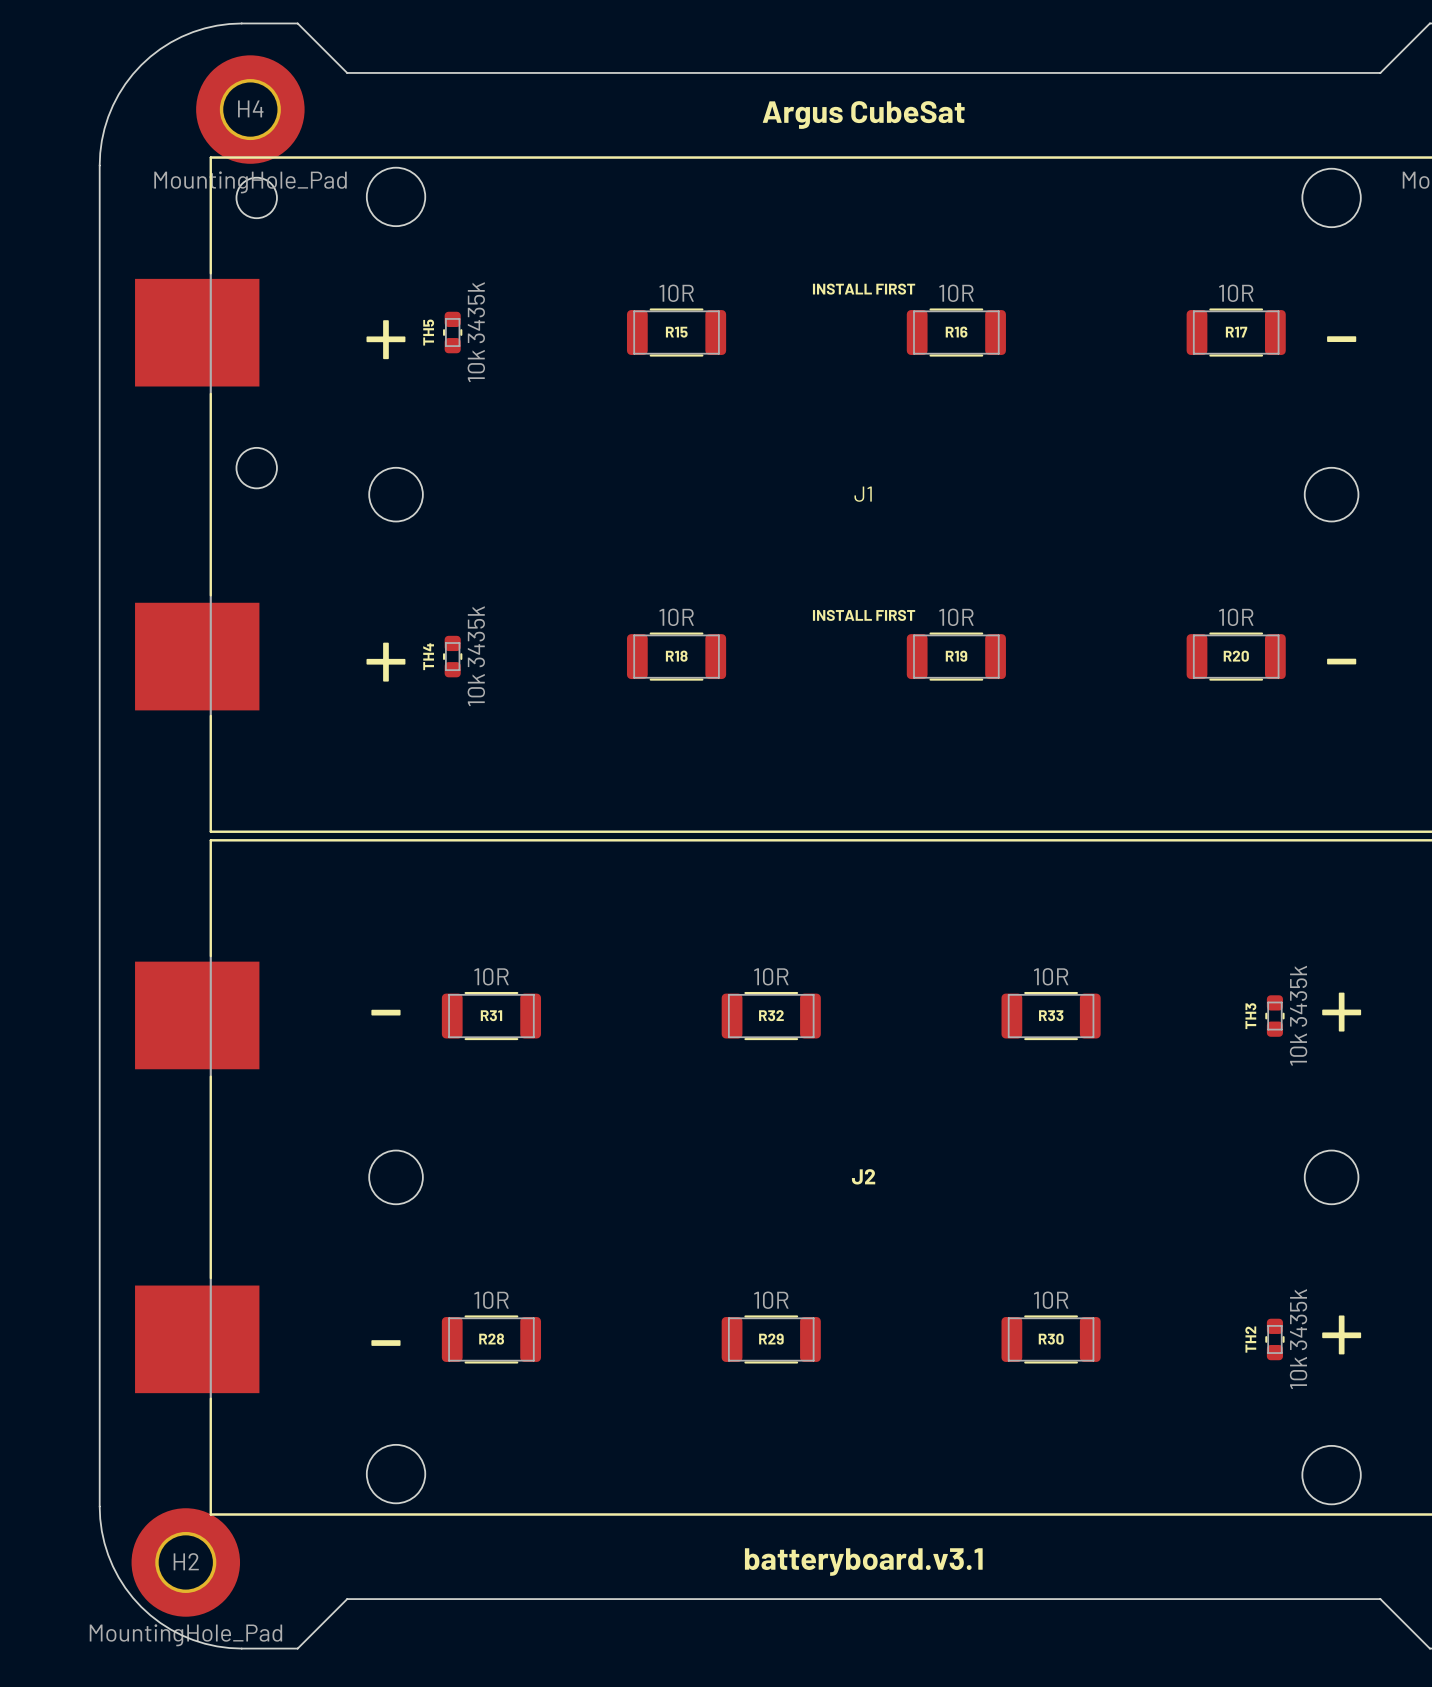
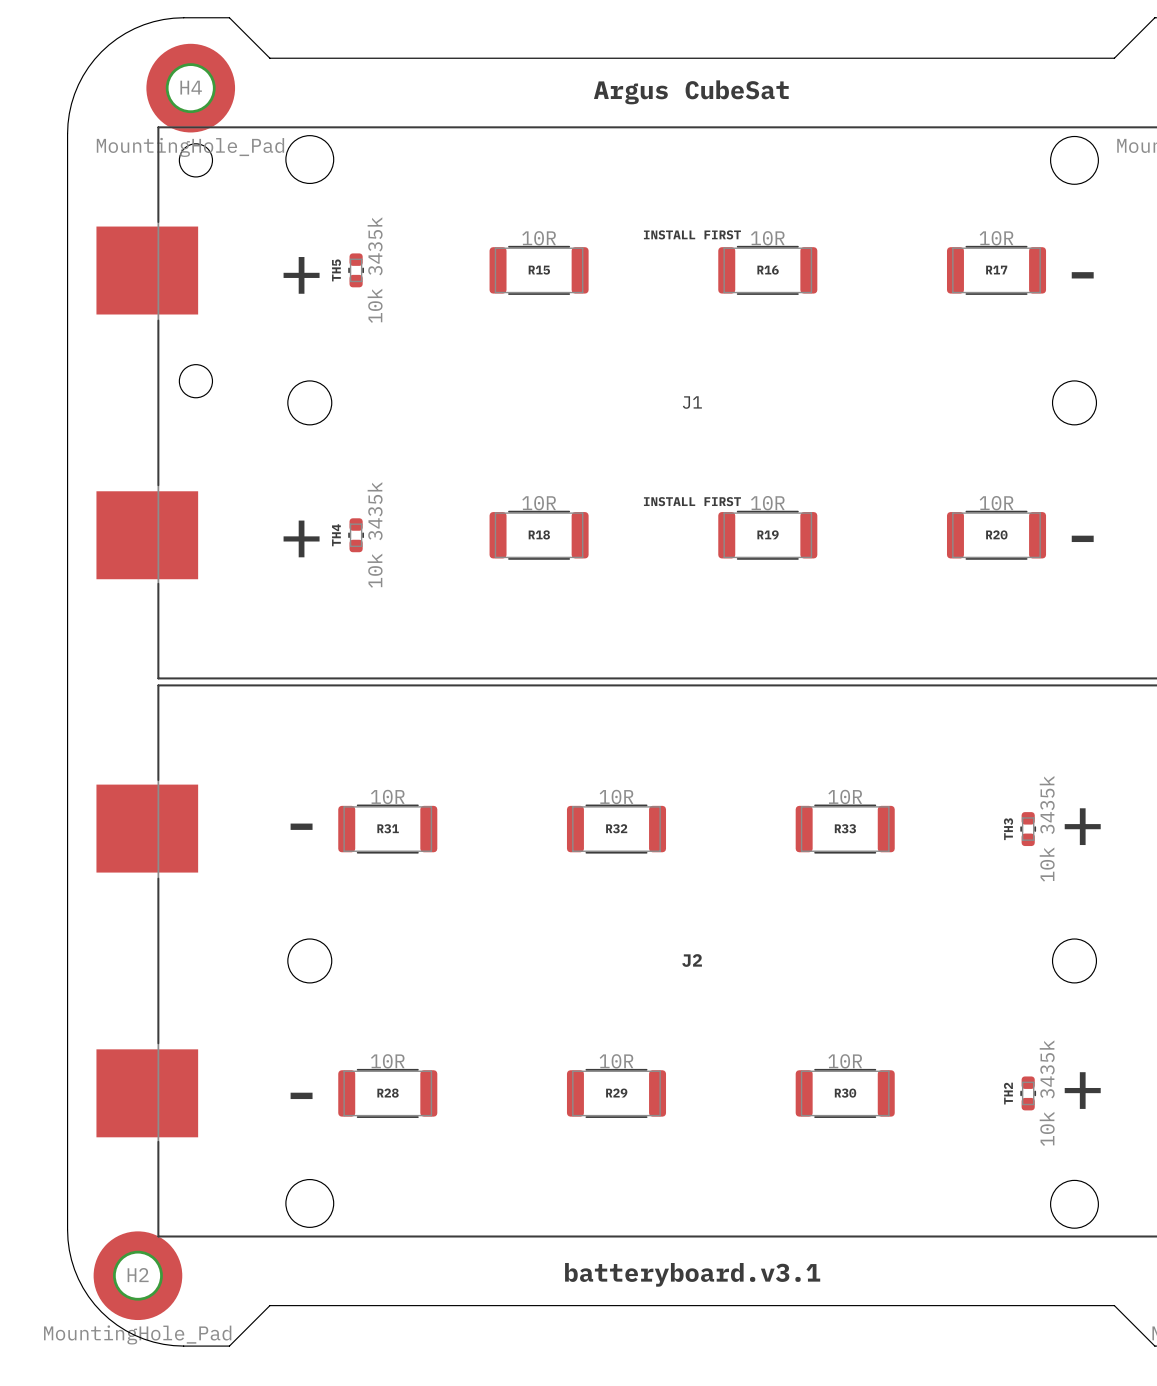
R15 footprint: [626, 308, 727, 357] -> [489, 245, 589, 295]
R16 footprint: [906, 308, 1006, 357] -> [718, 245, 818, 295]
R17 footprint: [1186, 308, 1286, 357] -> [946, 245, 1047, 295]
R18 footprint: [626, 632, 727, 681] -> [489, 510, 589, 560]
R19 footprint: [906, 632, 1006, 681] -> [718, 510, 818, 560]
R20 footprint: [1186, 632, 1286, 681] -> [946, 510, 1047, 560]
R31 footprint: [441, 991, 542, 1041] -> [338, 804, 438, 854]
R32 footprint: [721, 991, 821, 1041] -> [566, 804, 667, 854]
R33 footprint: [1001, 991, 1101, 1041] -> [795, 804, 895, 854]
R28 footprint: [441, 1315, 542, 1364] -> [338, 1068, 438, 1118]
R29 footprint: [721, 1315, 821, 1364] -> [566, 1068, 667, 1118]
R30 footprint: [1001, 1315, 1101, 1364] -> [795, 1068, 895, 1118]

